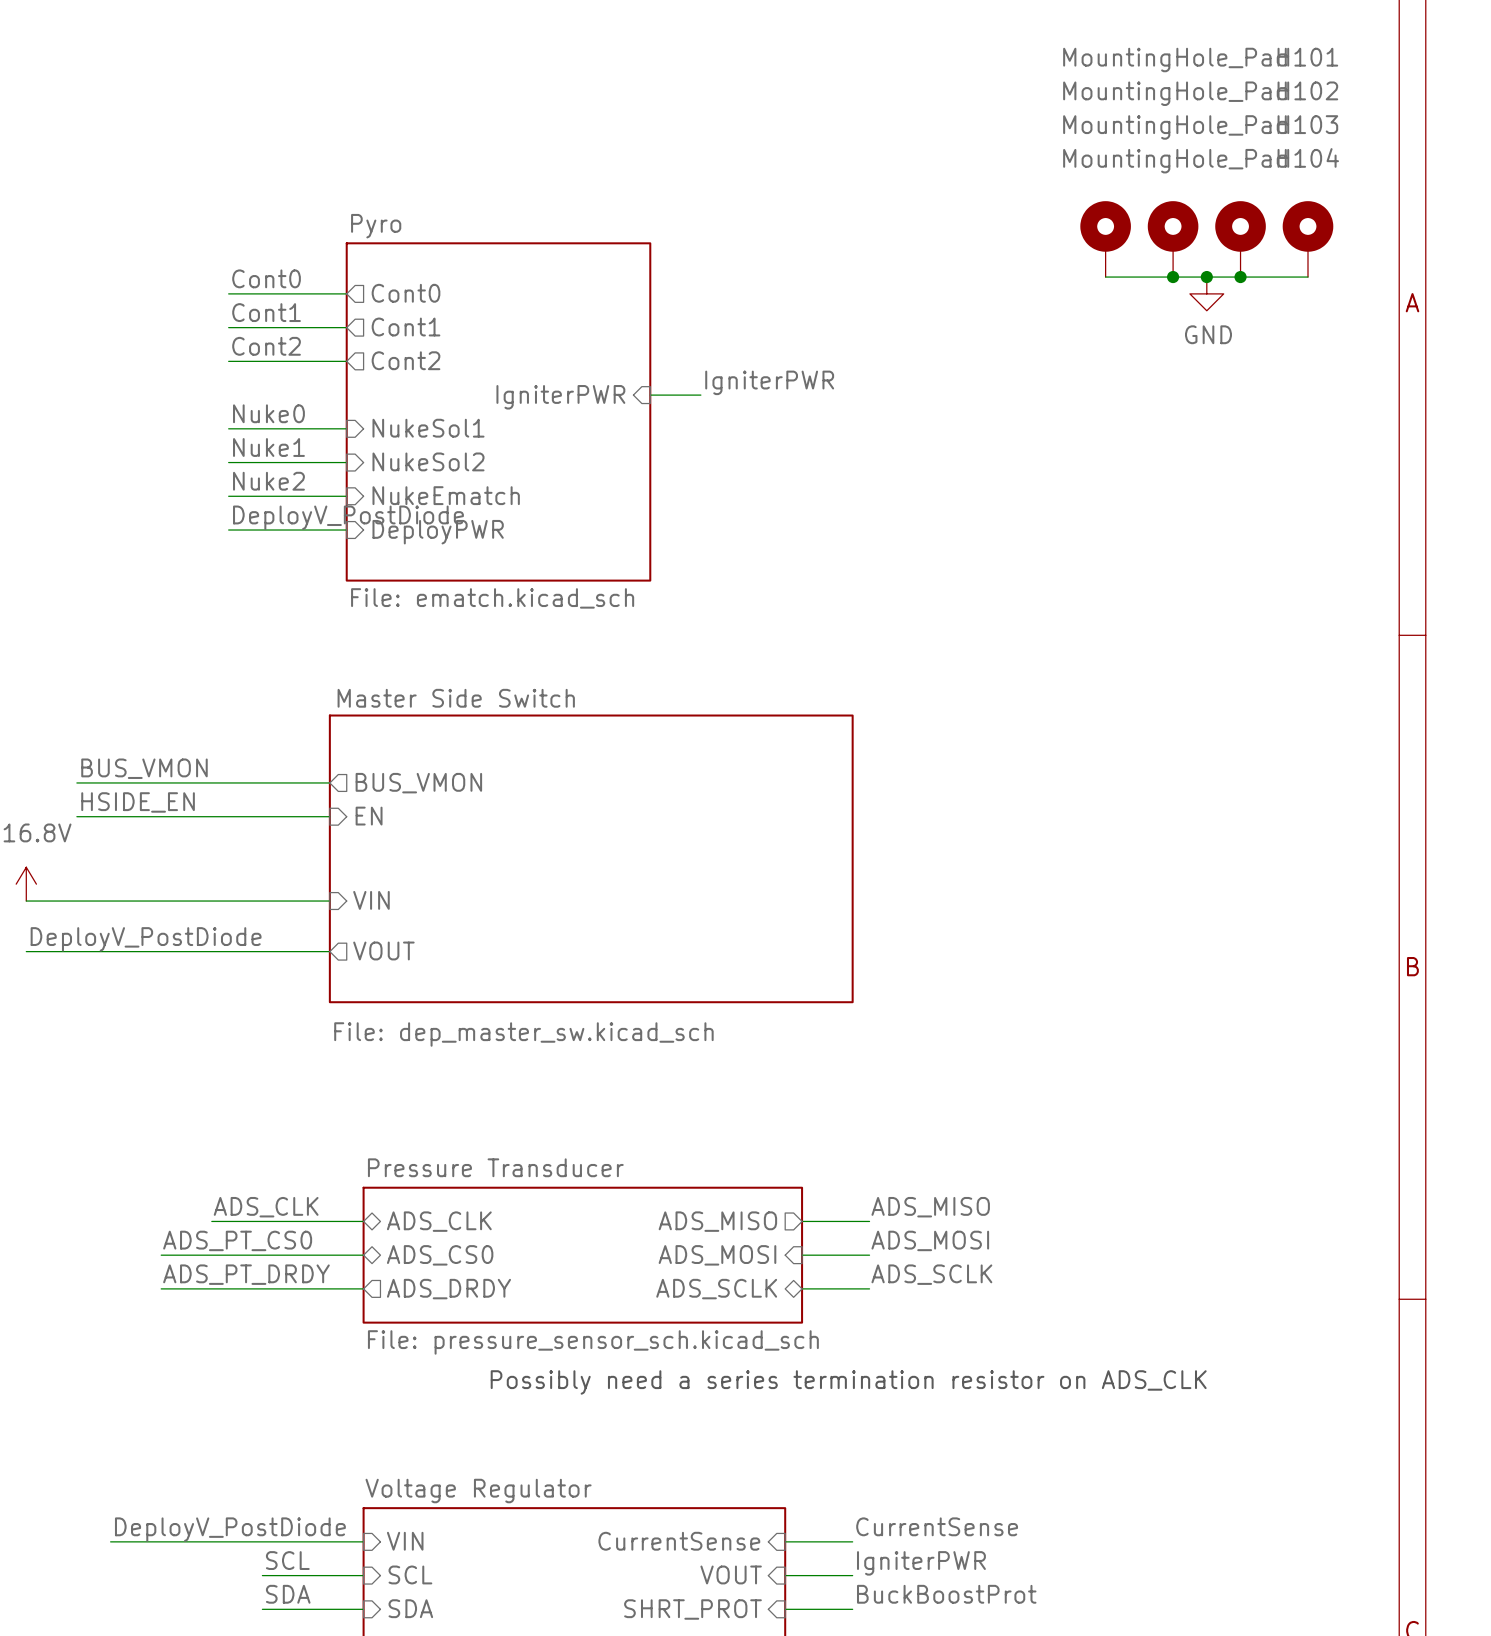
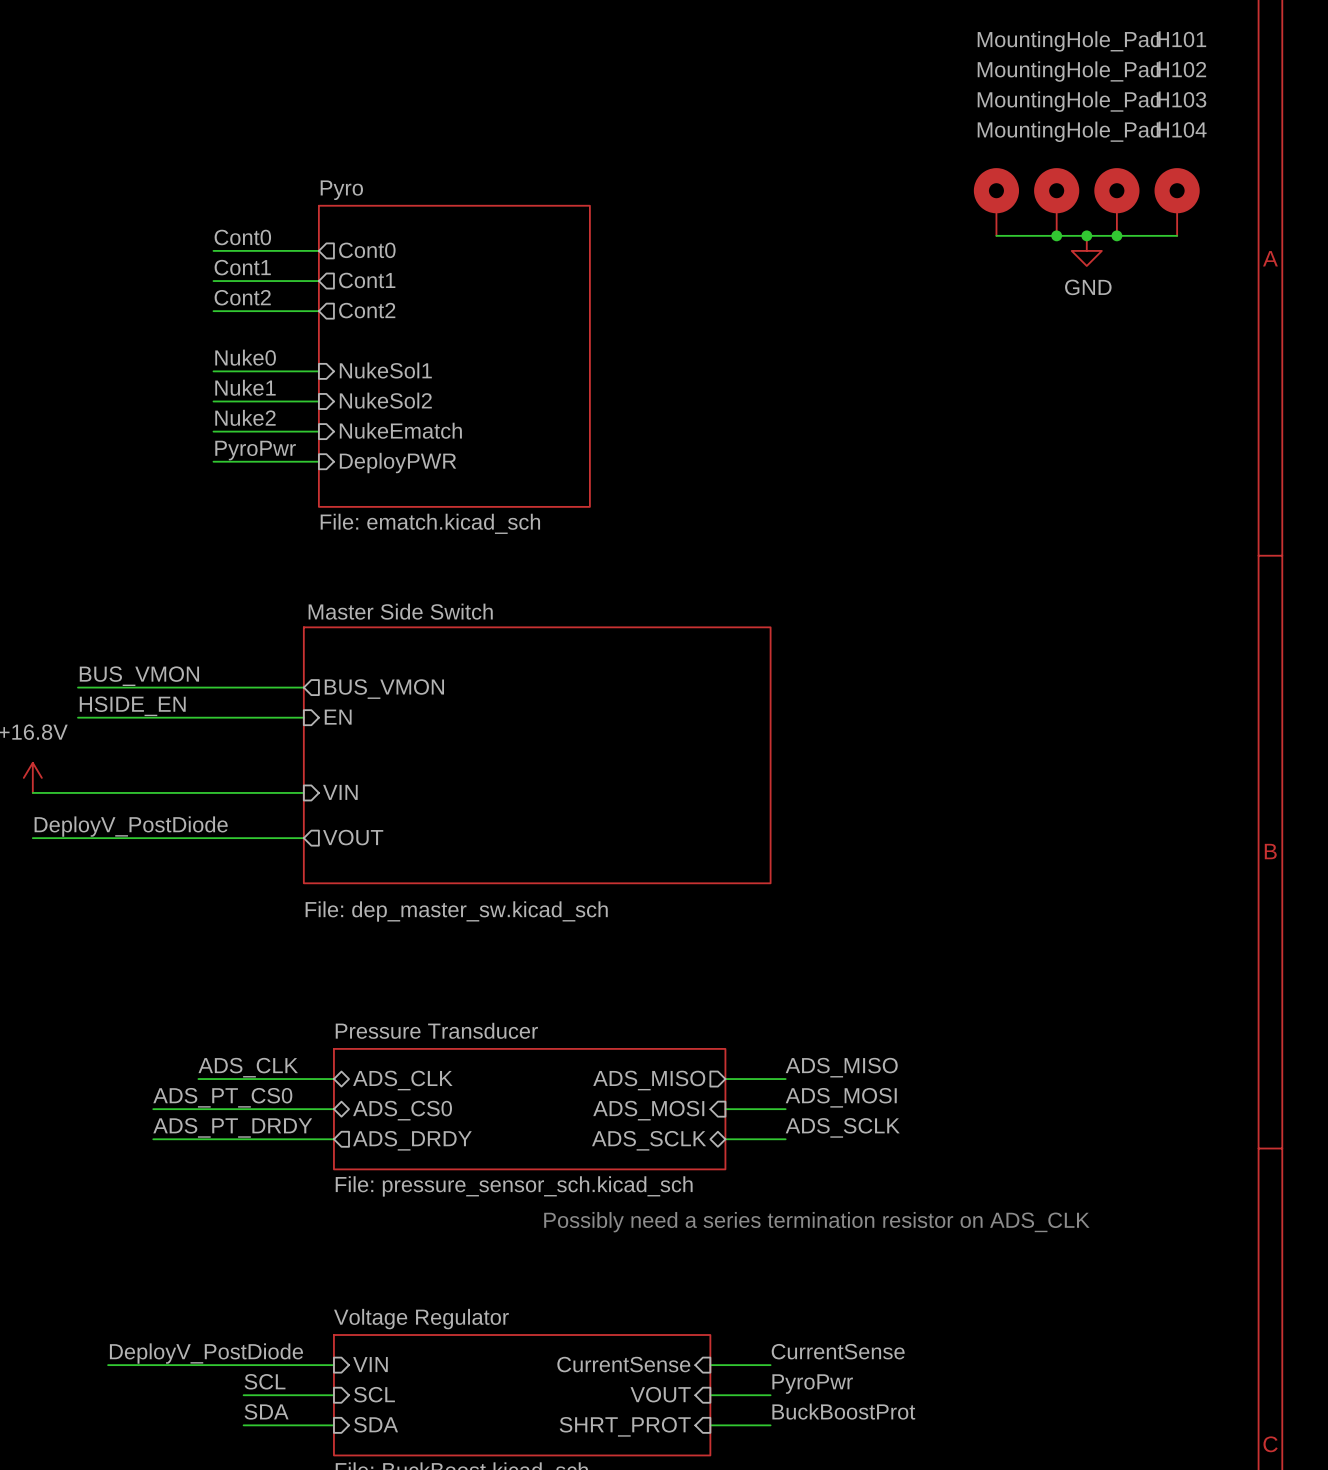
label: IgniterPWR (769, 382) -> none
wire: (650, 395) (700, 395) -> none
sheet pin: IgniterPWR (560, 397) -> none
label: DeployV_PostDiode (348, 517) -> PyroPwr (255, 450)
label: IgniterPWR (921, 1563) -> PyroPwr (812, 1384)

